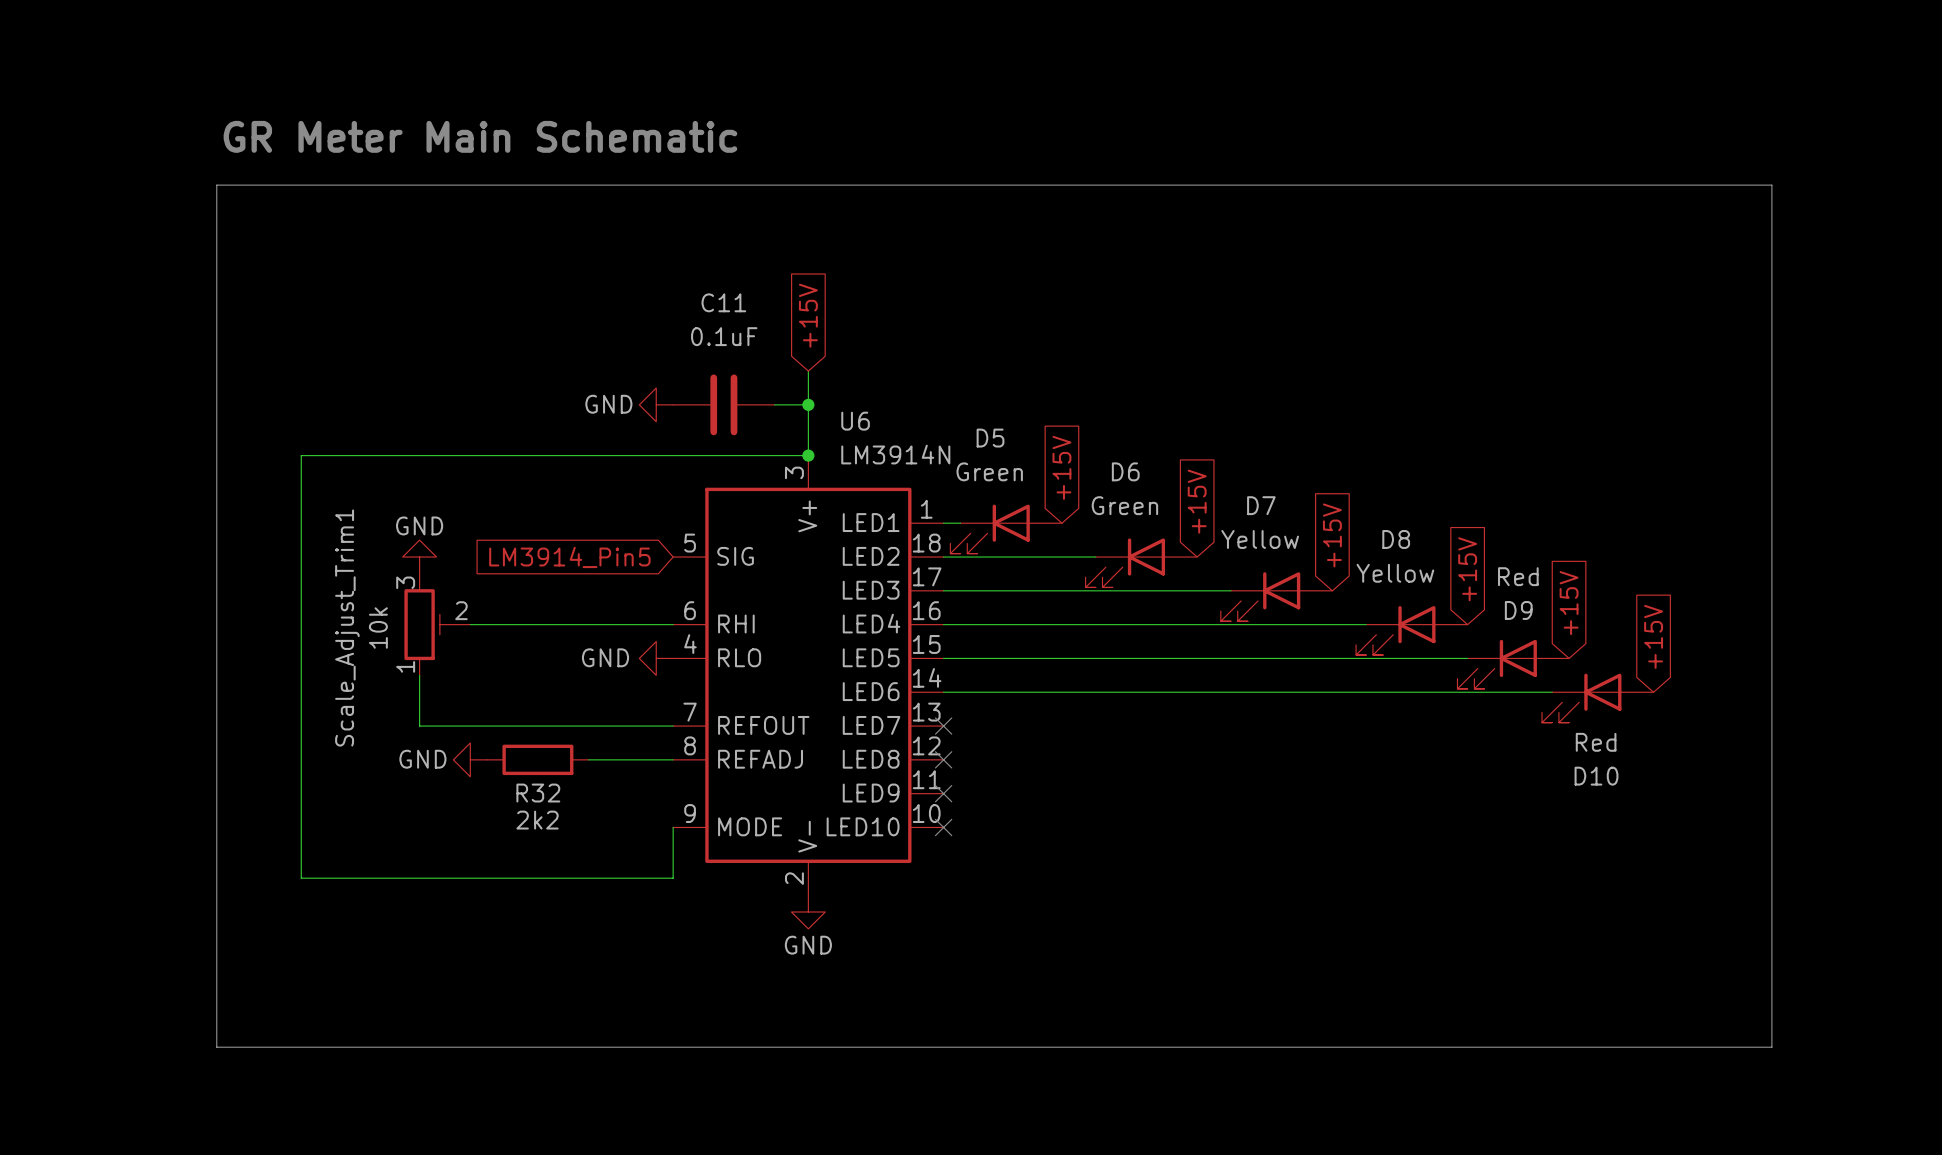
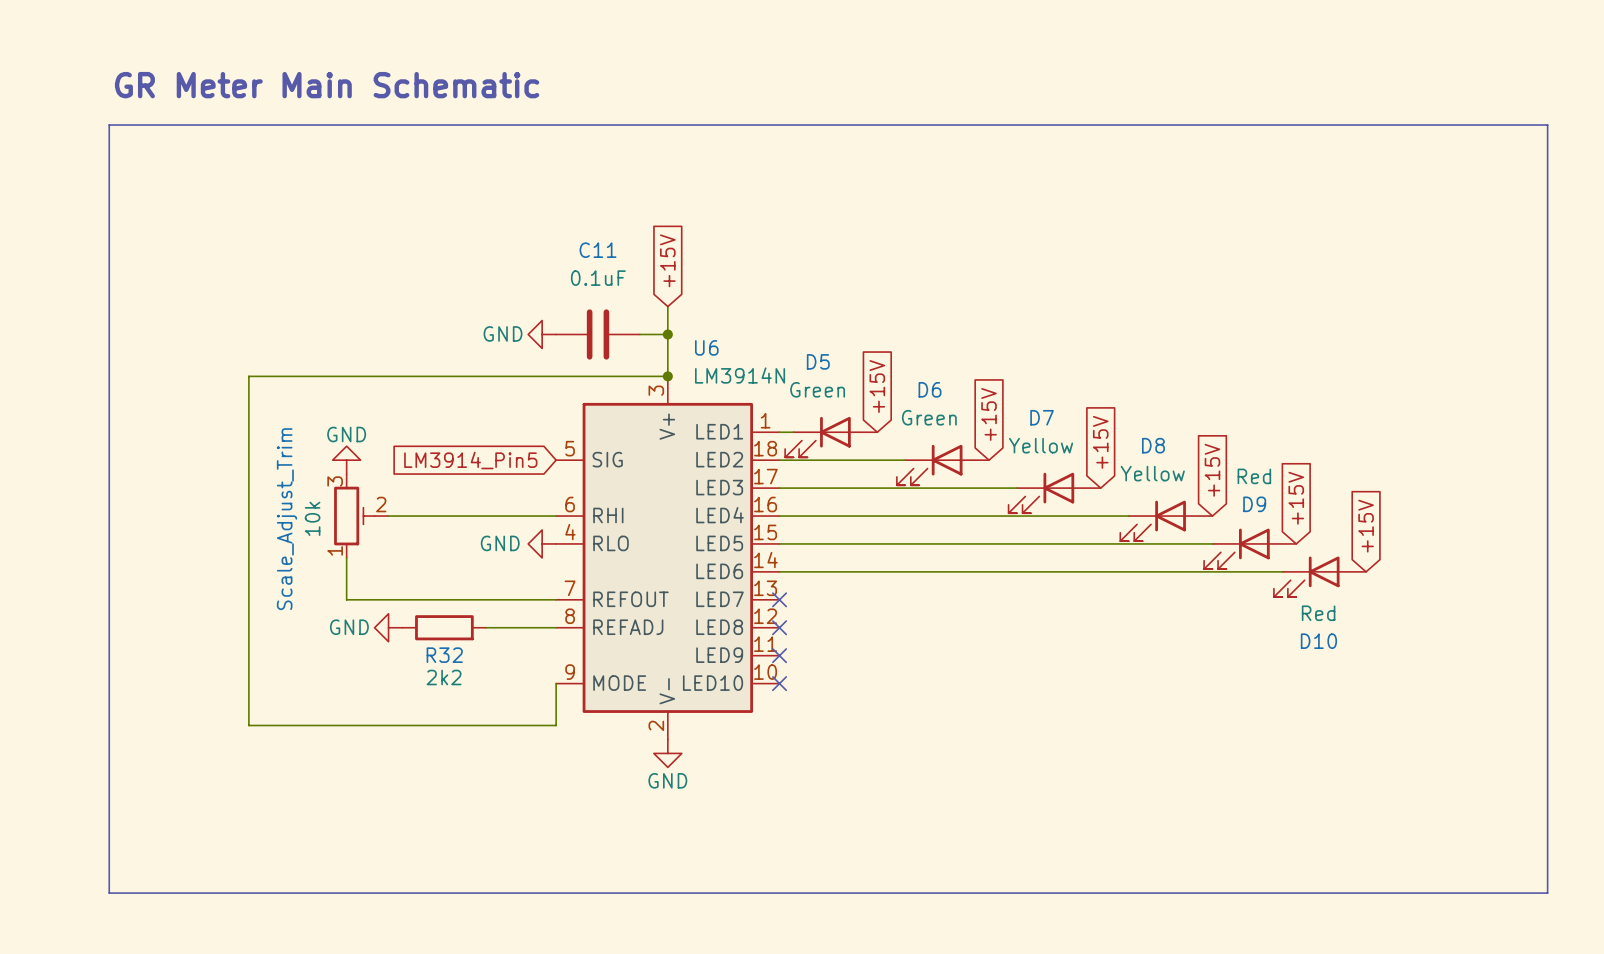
text position: GR Meter Main Schematic (480, 136) -> GR Meter Main Schematic (327, 85)
line: (216, 185) (1771, 185) (1771, 1047) (216, 1047) (216, 185) -> (109, 125) (109, 893) (1547, 893) (1547, 125) (109, 125)
Scale_Adjust_Trim1 name: Scale_Adjust_Trim1 (347, 628) -> Scale_Adjust_Trim (287, 519)

